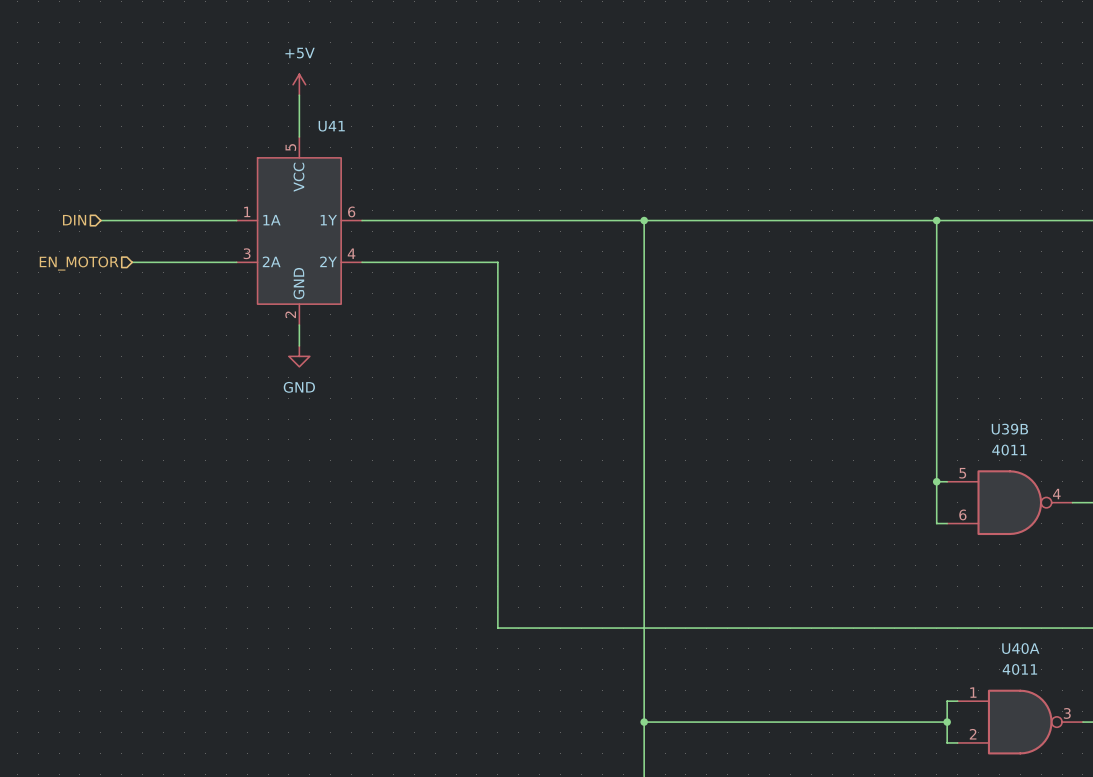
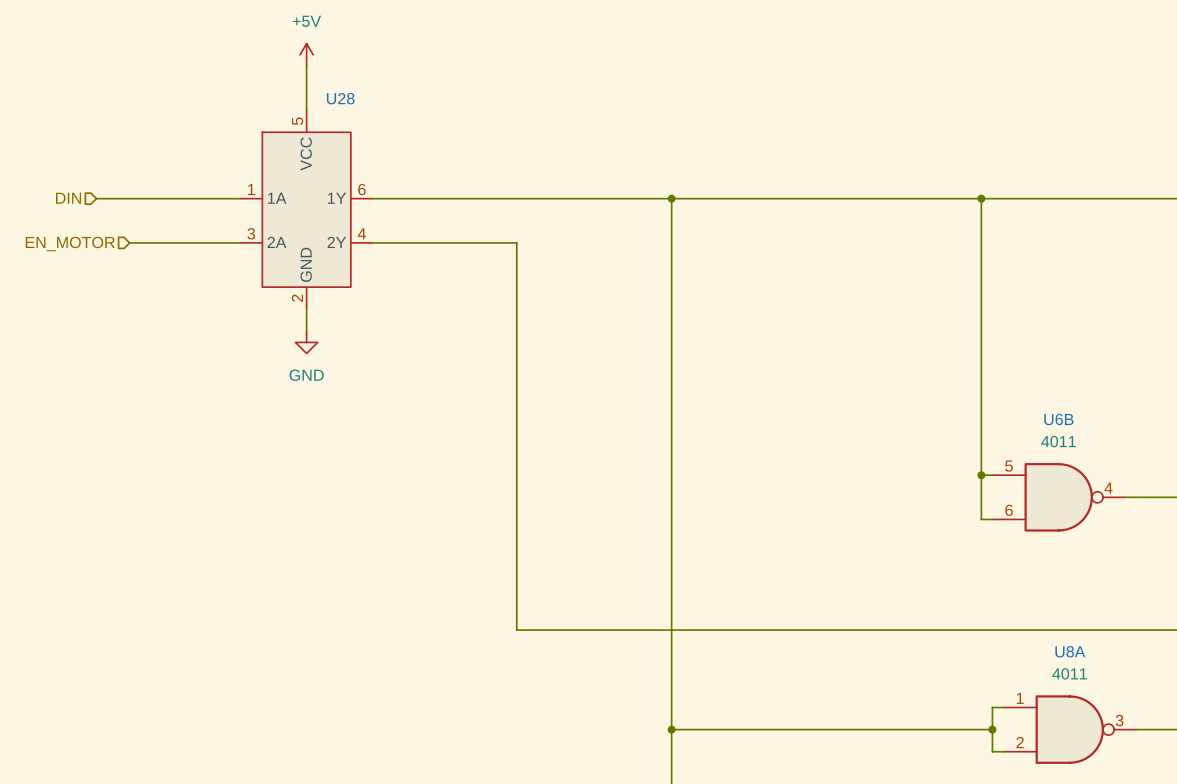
U41 name: U41 (331, 126) -> U28 (340, 98)
U39B name: U39B (1009, 429) -> U6B (1058, 419)
U40A name: U40A (1020, 648) -> U8A (1070, 651)

